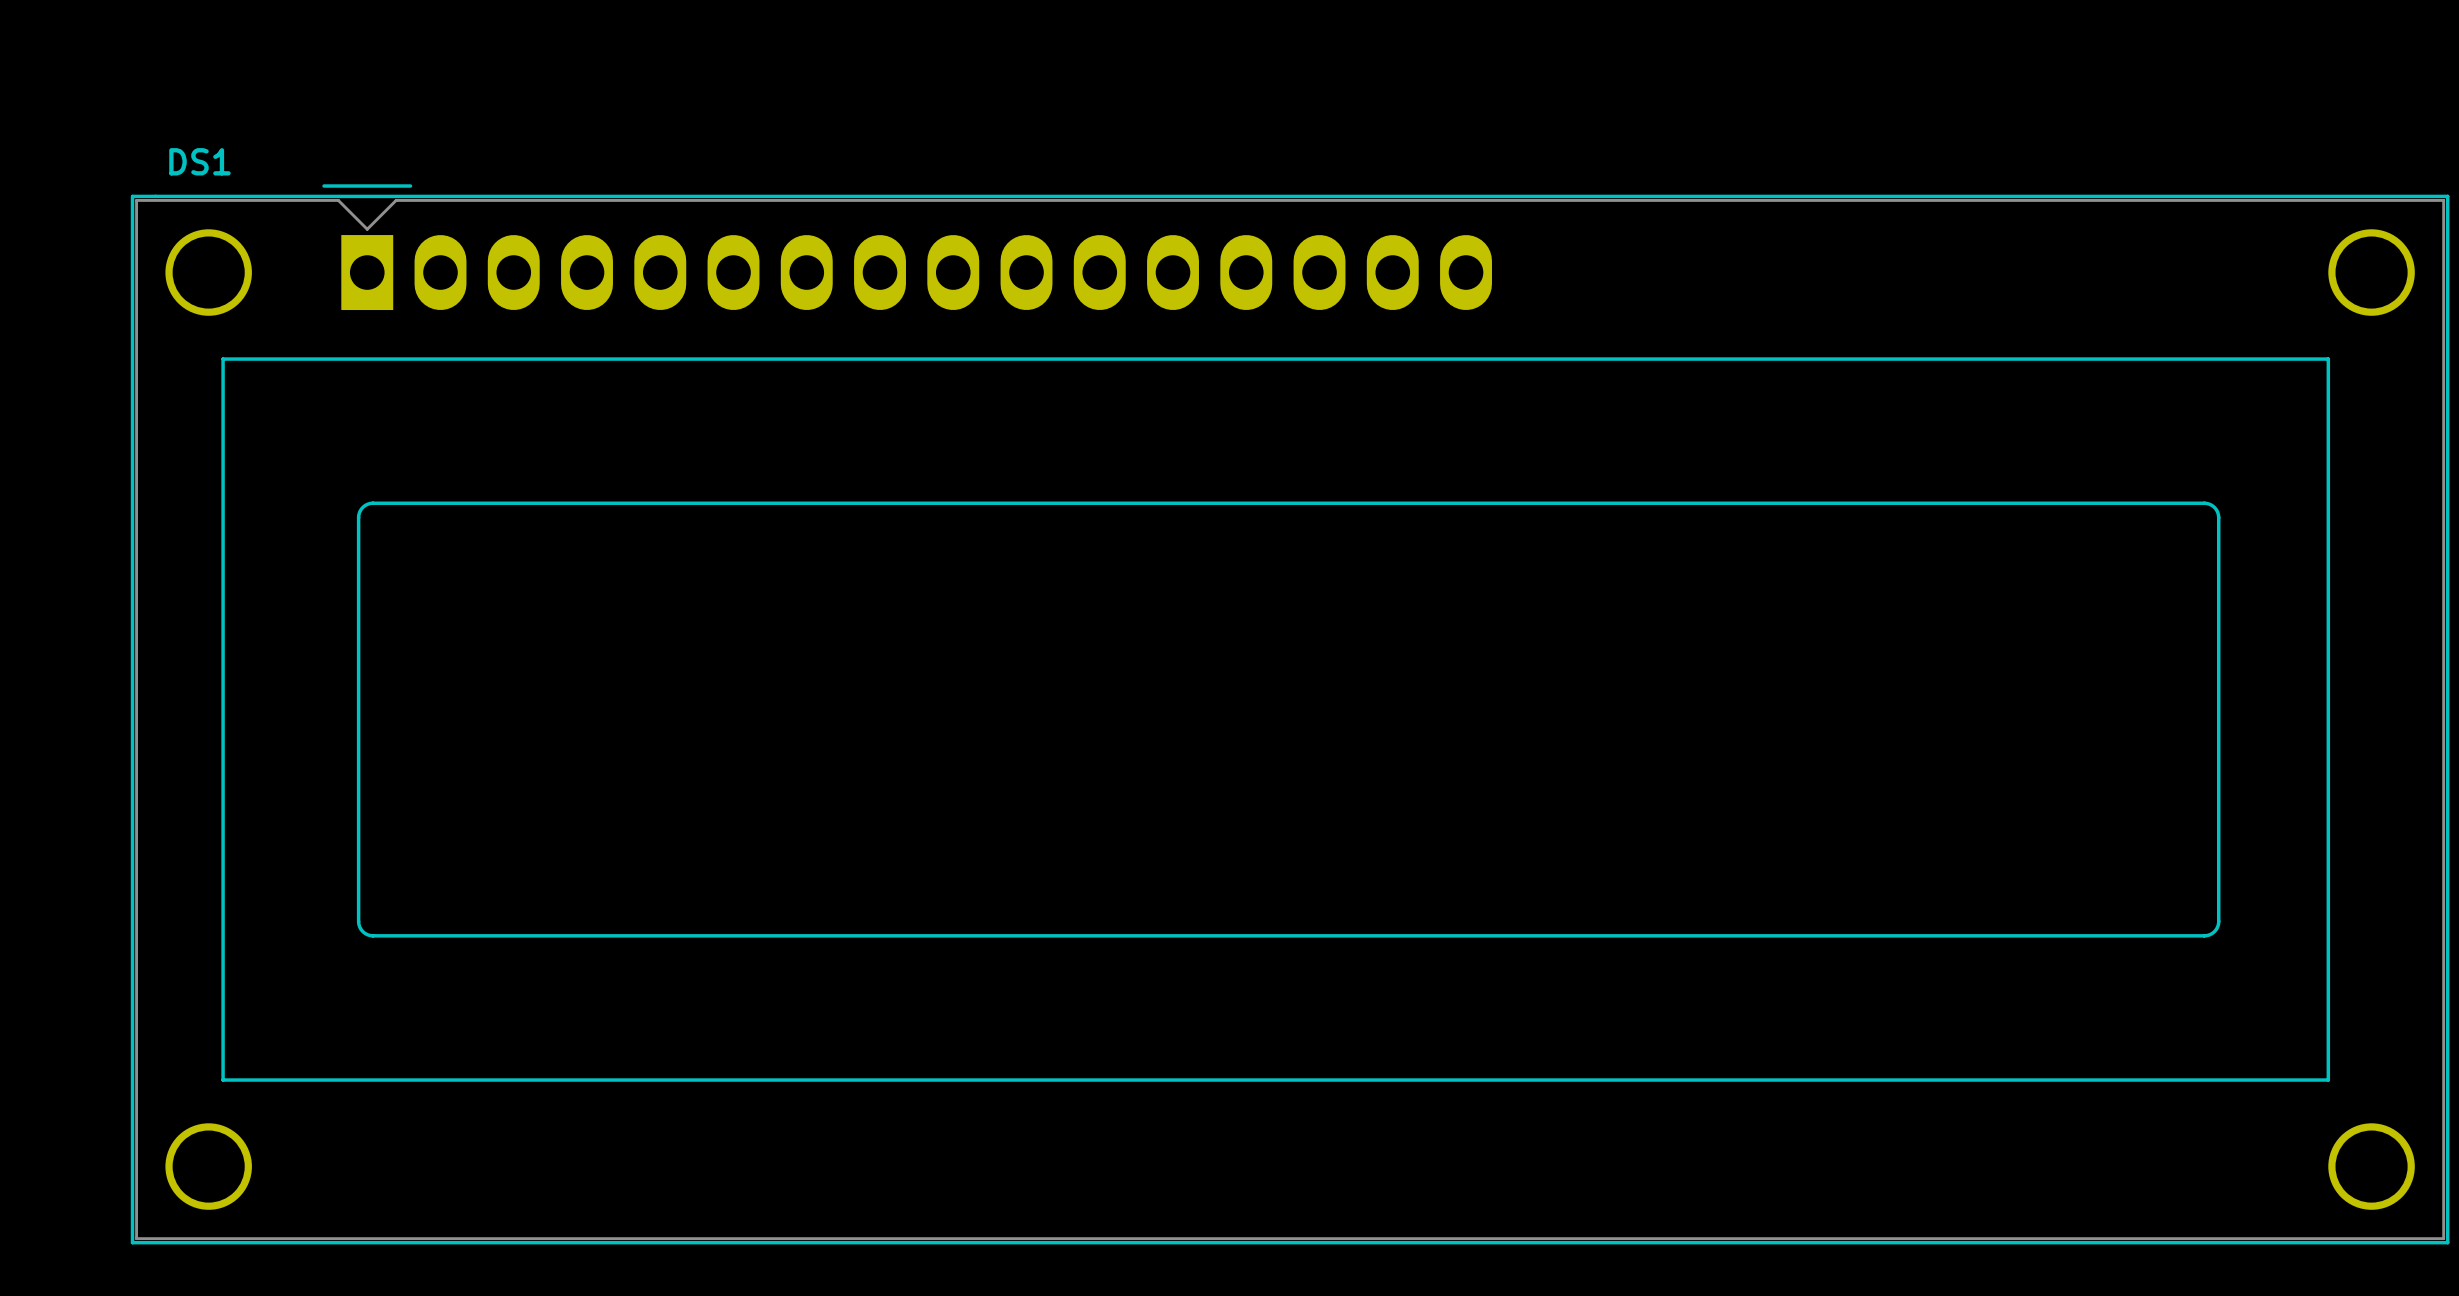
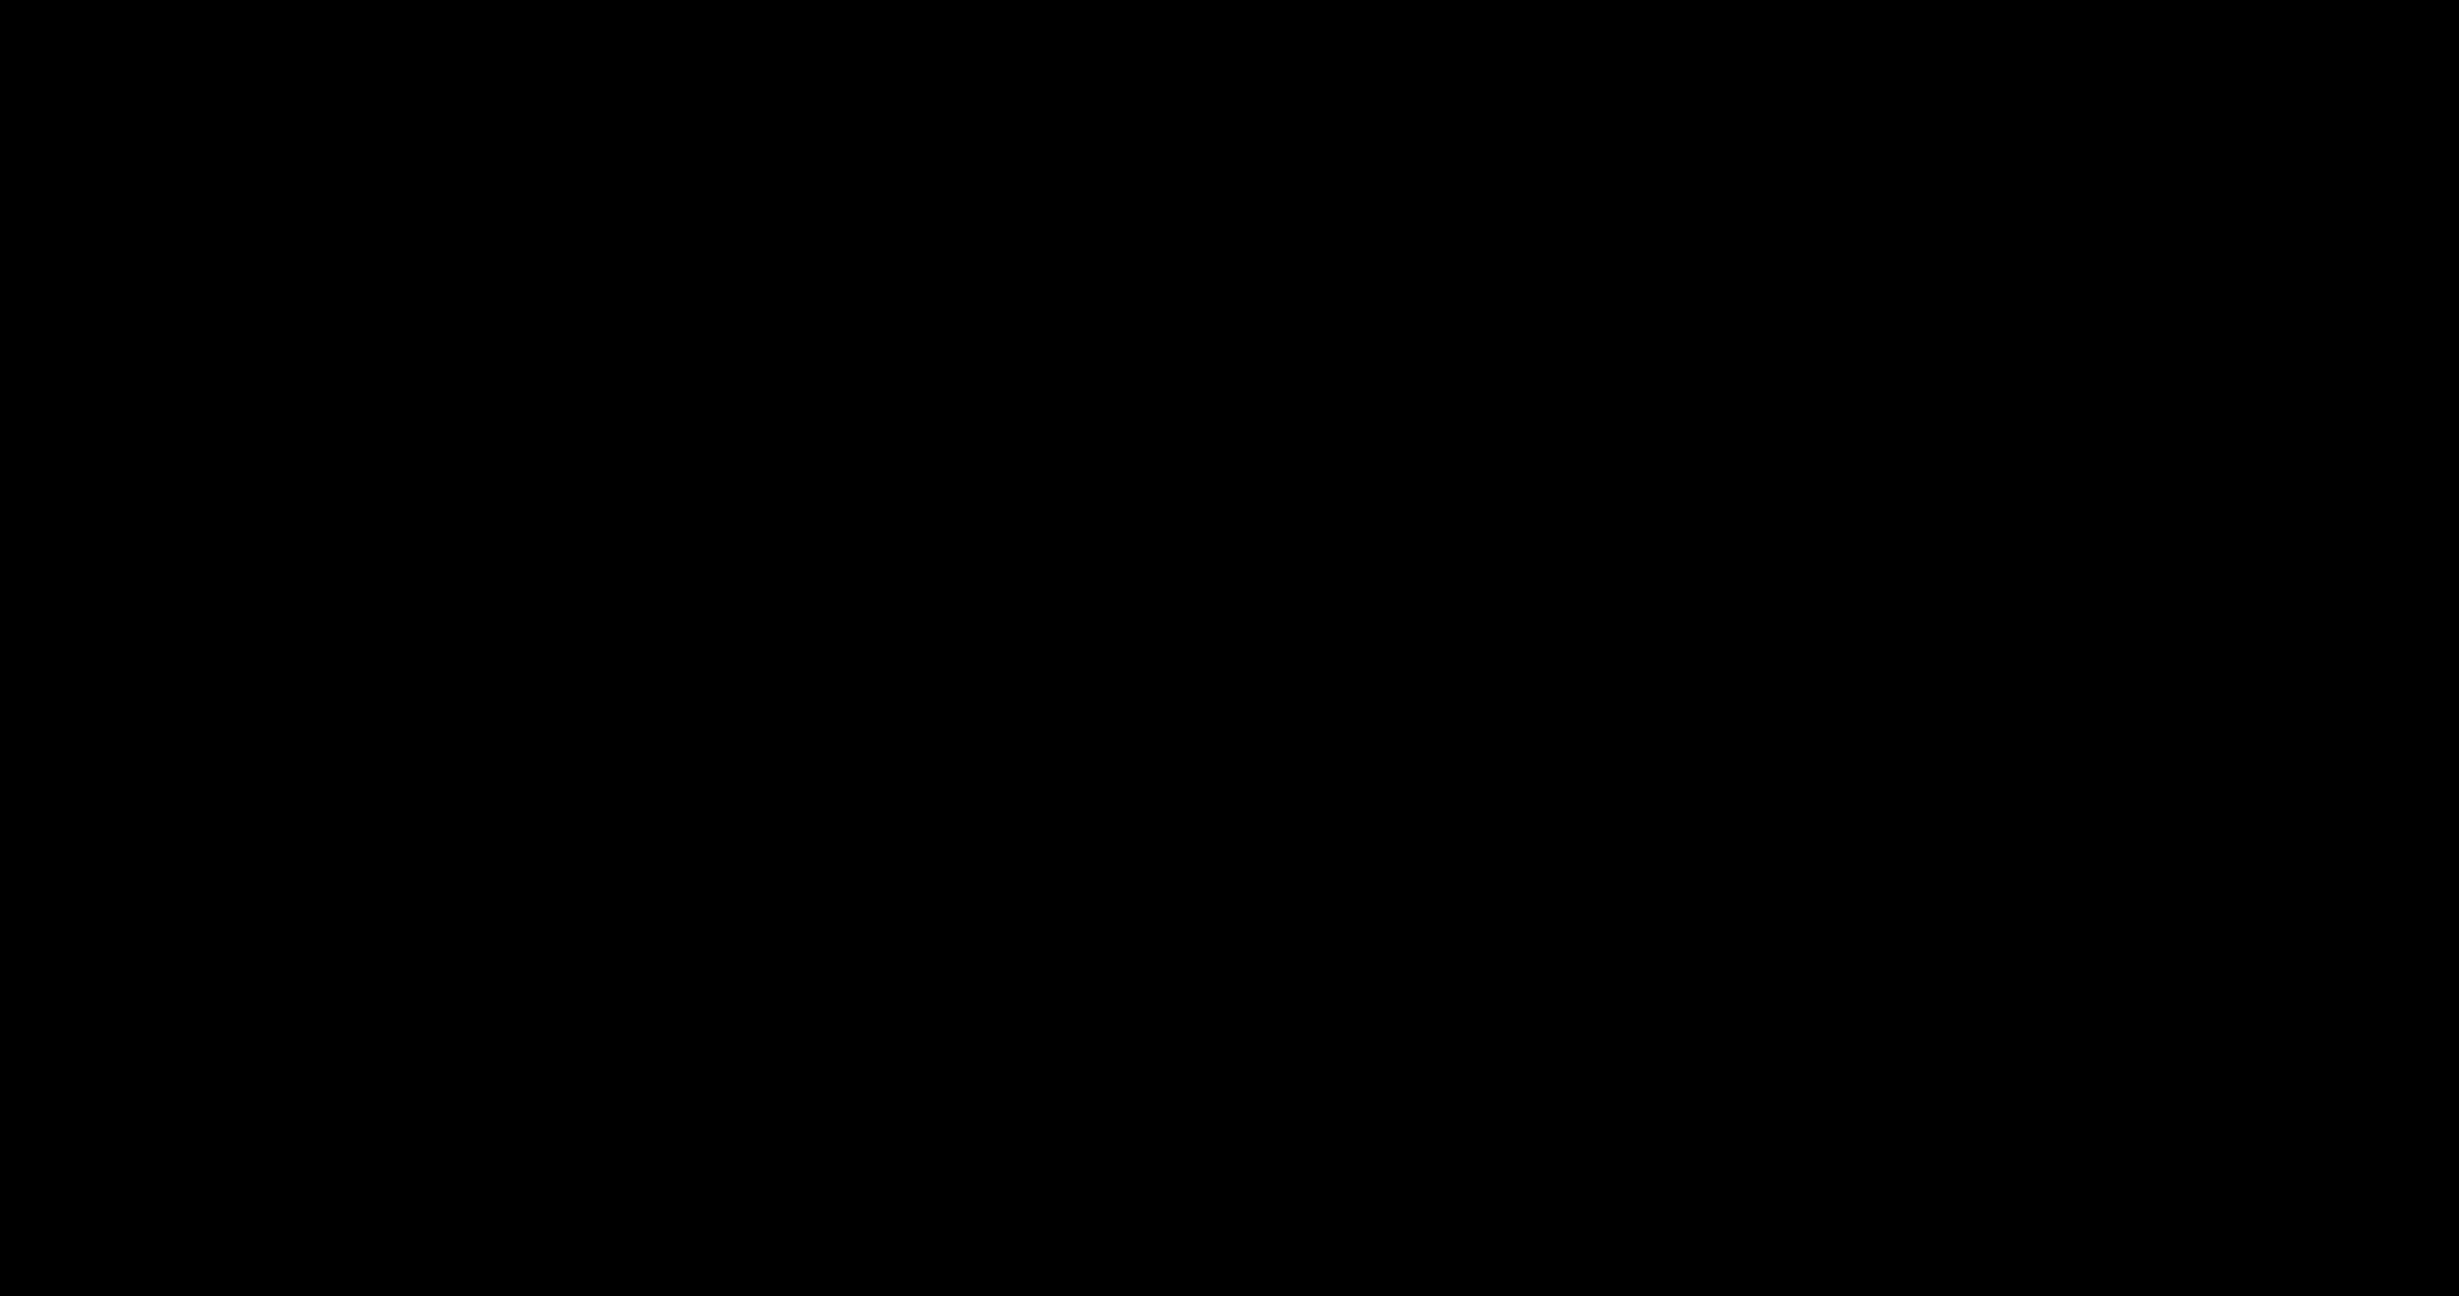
DS1: (1290, 714) -> none

